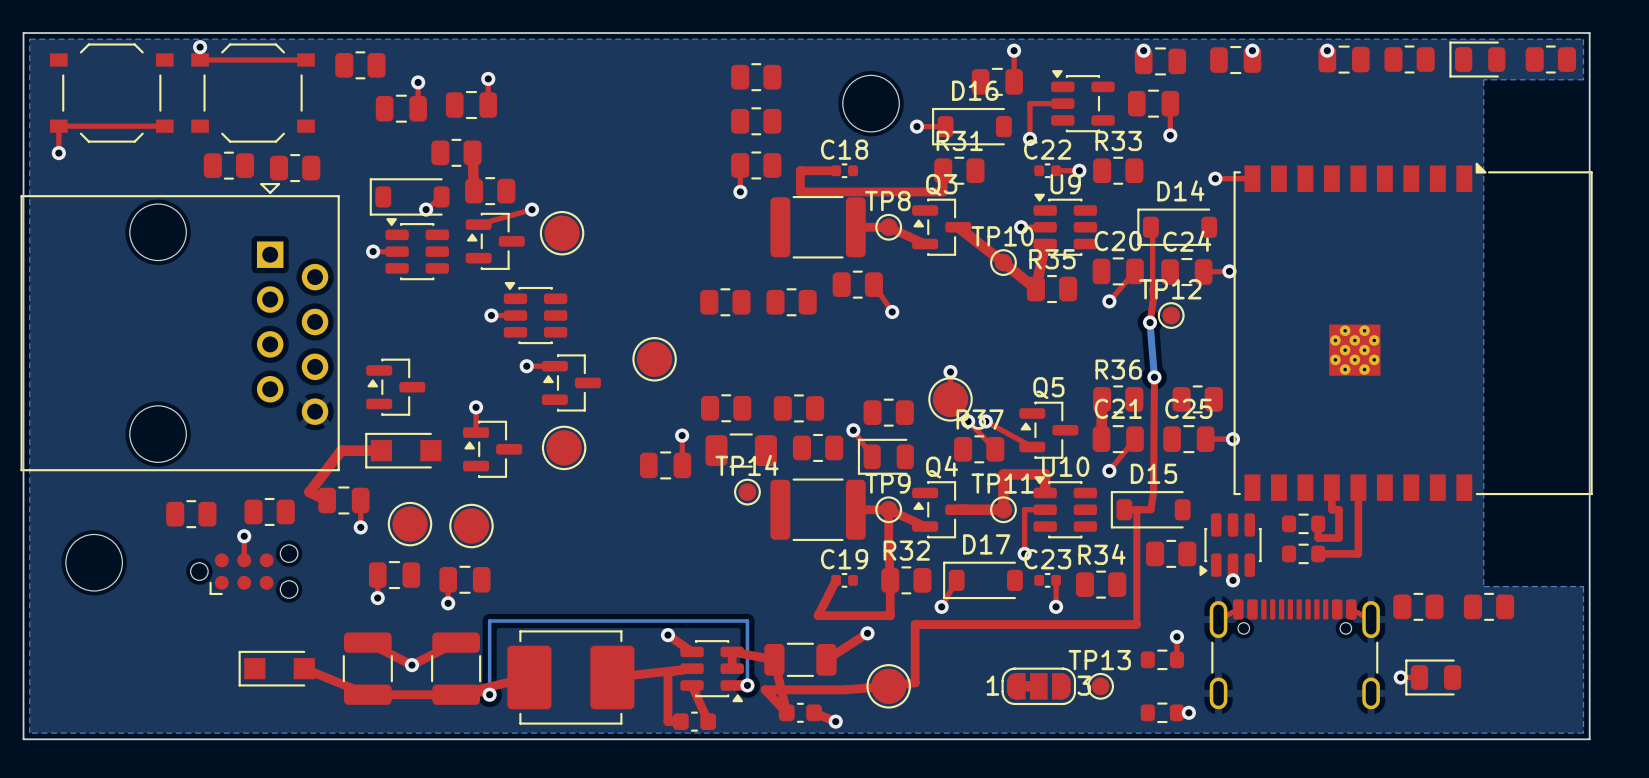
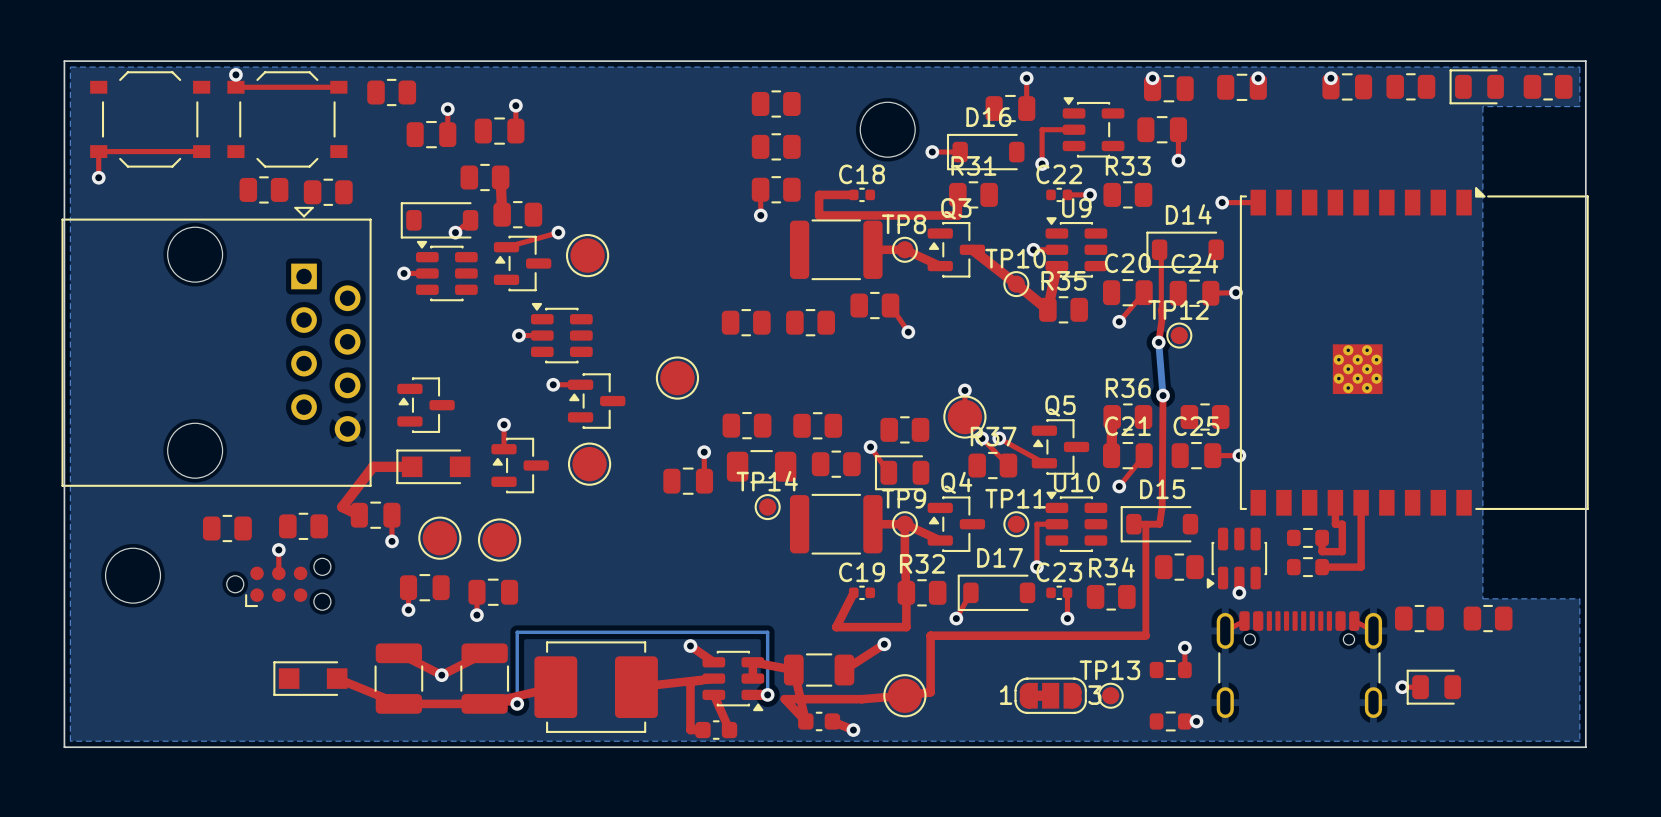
top track: (1045, 492) (1045, 474) (1003, 474) (1003, 509) (958, 509) -> none

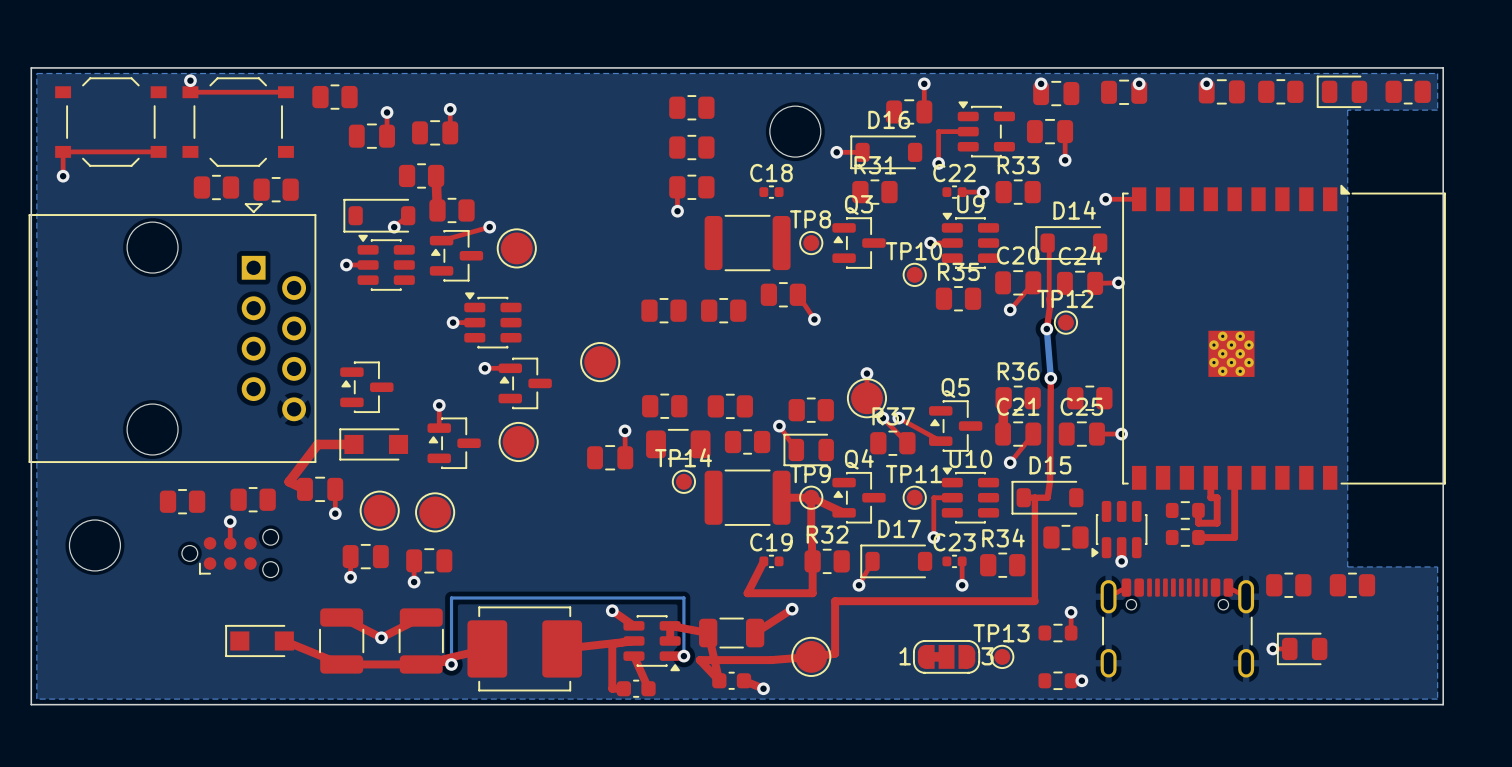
top track: (853, 194) (819, 194) (819, 215) (957, 215) (957, 194) -> none
top track: (872, 249) (904, 249) (940, 266) -> none
top track: (972, 249) (1047, 309) (1056, 266) -> none

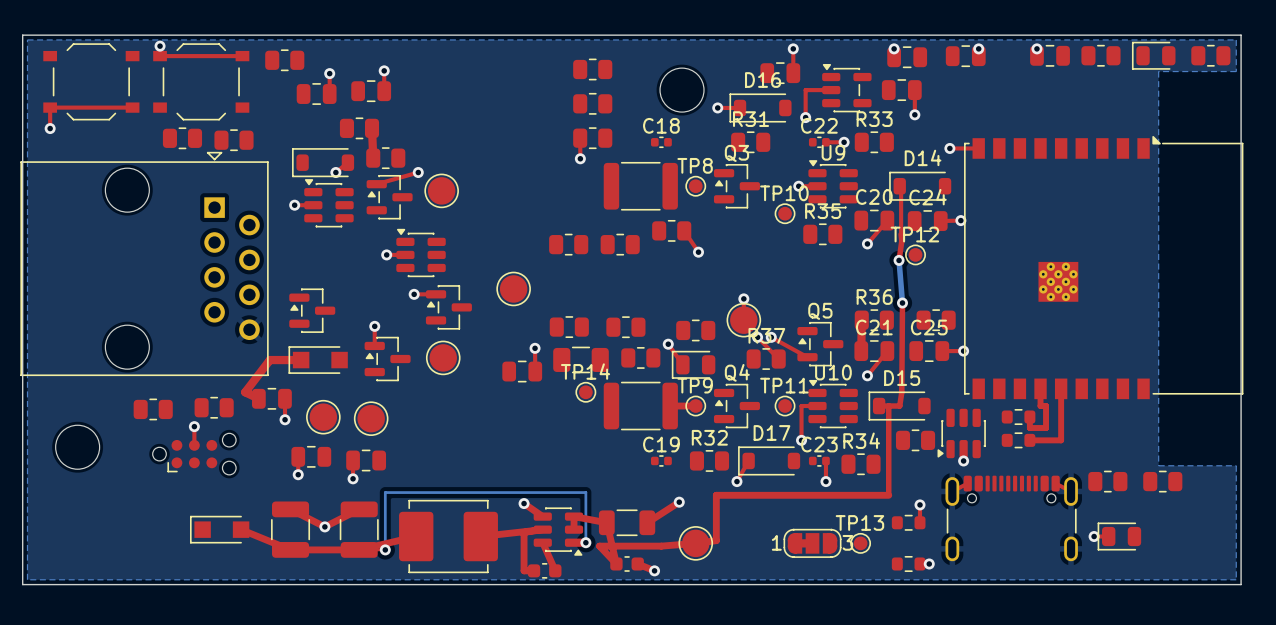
top track: (844, 512) (811, 497) (812, 593) (747, 593) (763, 561) -> none

